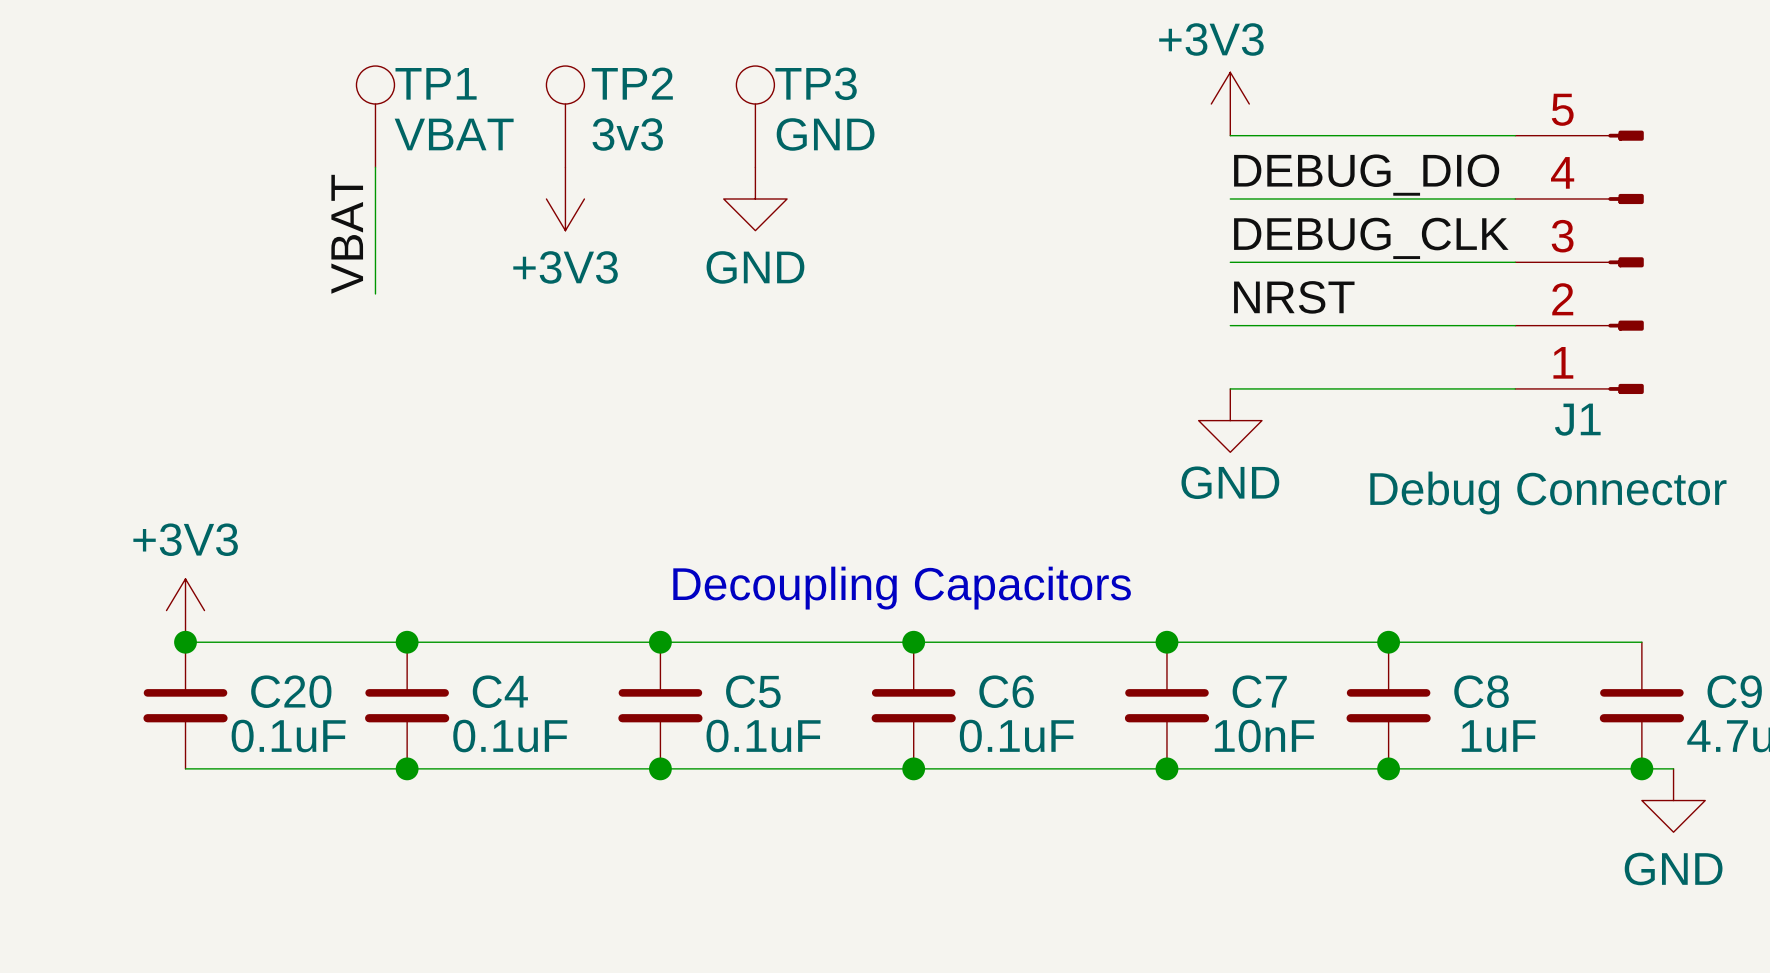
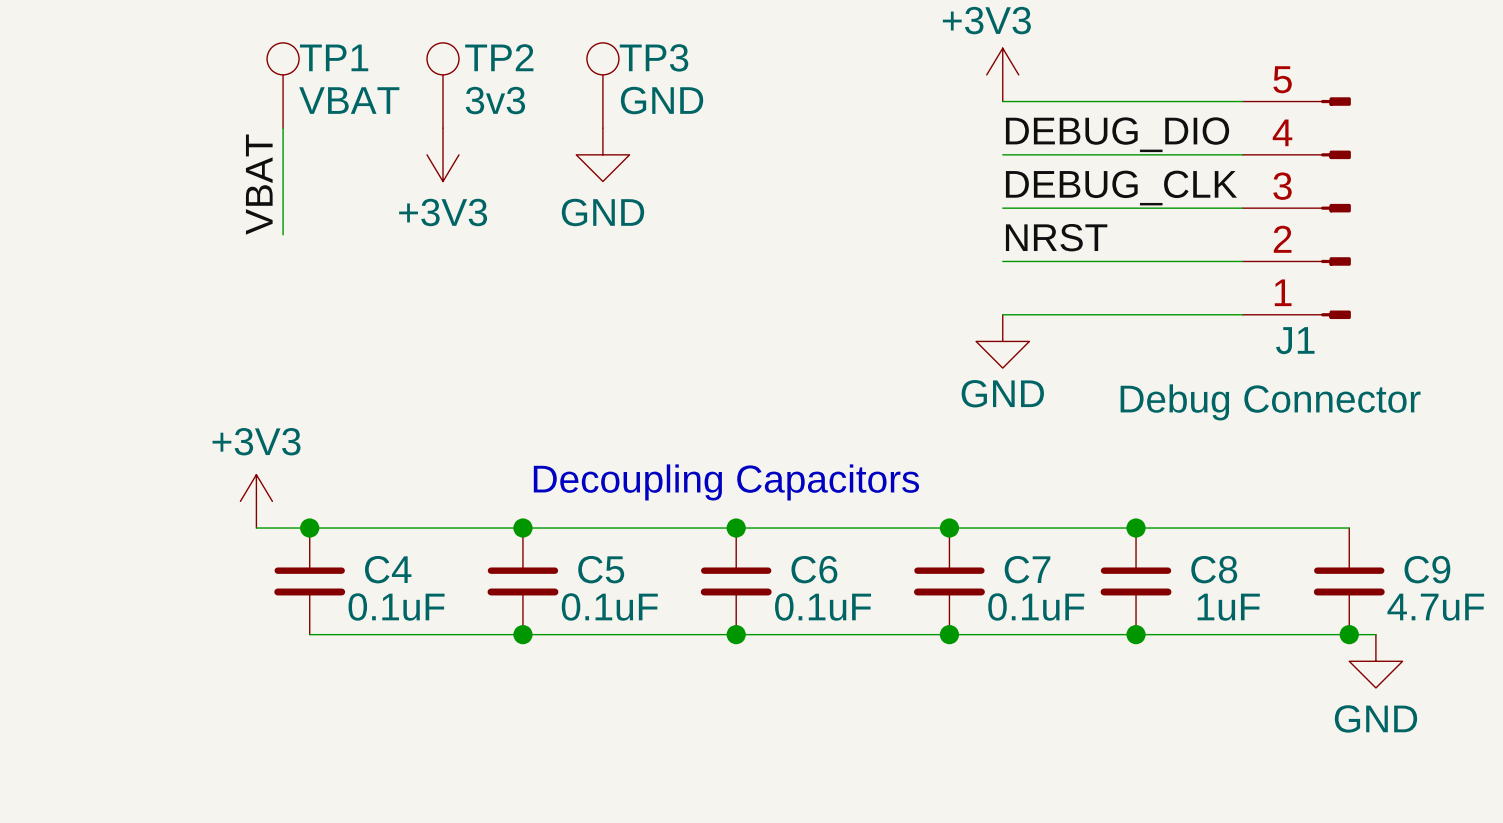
power symbol position: +3V3 (185, 610) -> +3V3 (256, 501)
wire: (185, 642) (343, 642) -> none
junction: (185, 642) -> none
C20: 0.1uF (185, 705) -> none
C7 value: 10nF (1264, 736) -> 0.1uF (1036, 606)
wire: (185, 768) (407, 768) -> none
junction: (407, 768) -> none

